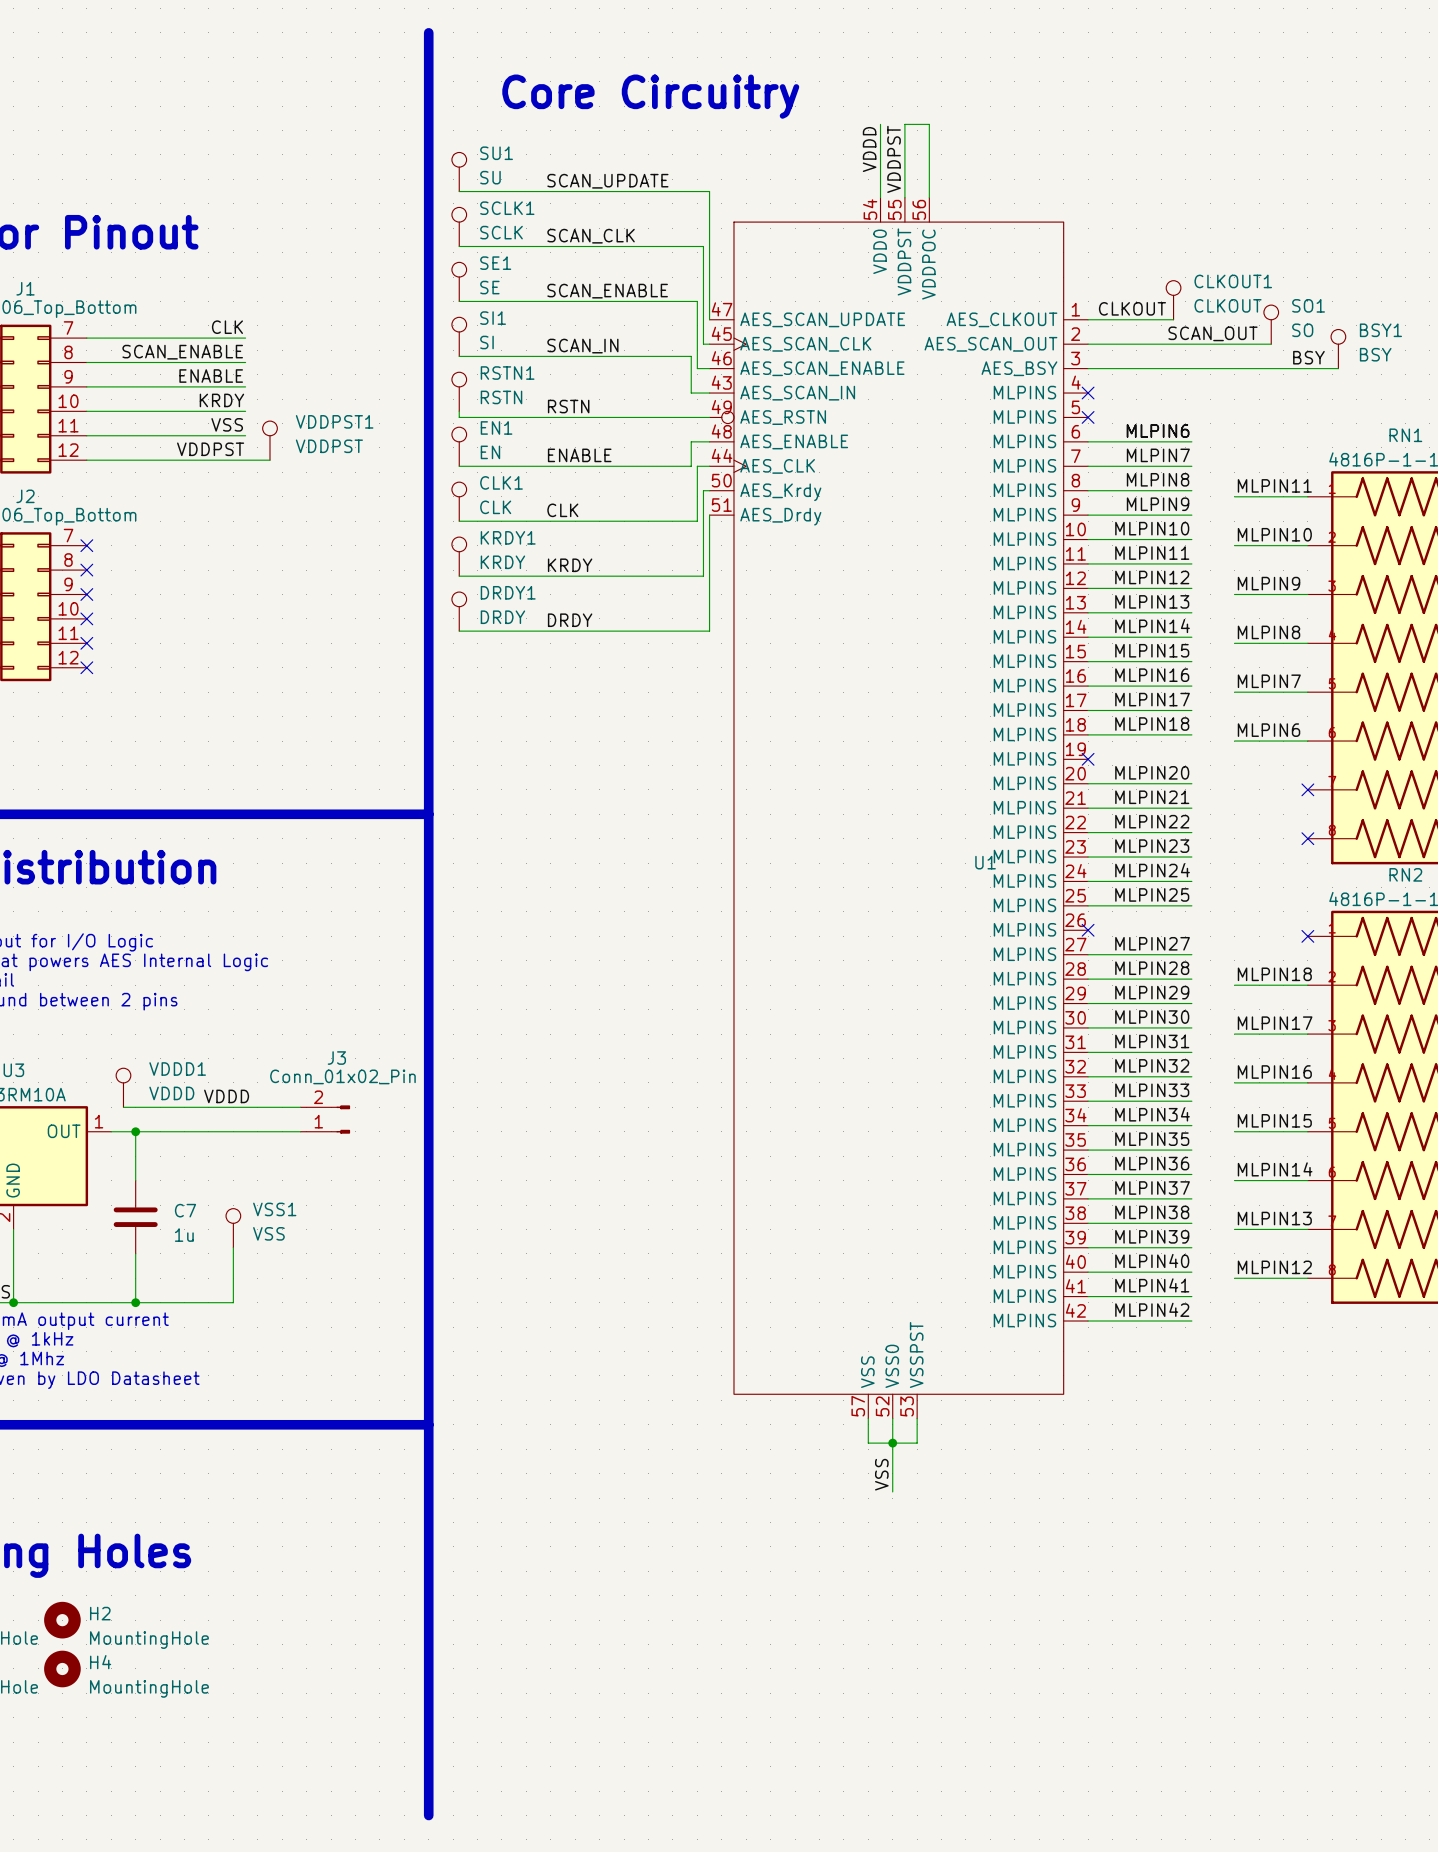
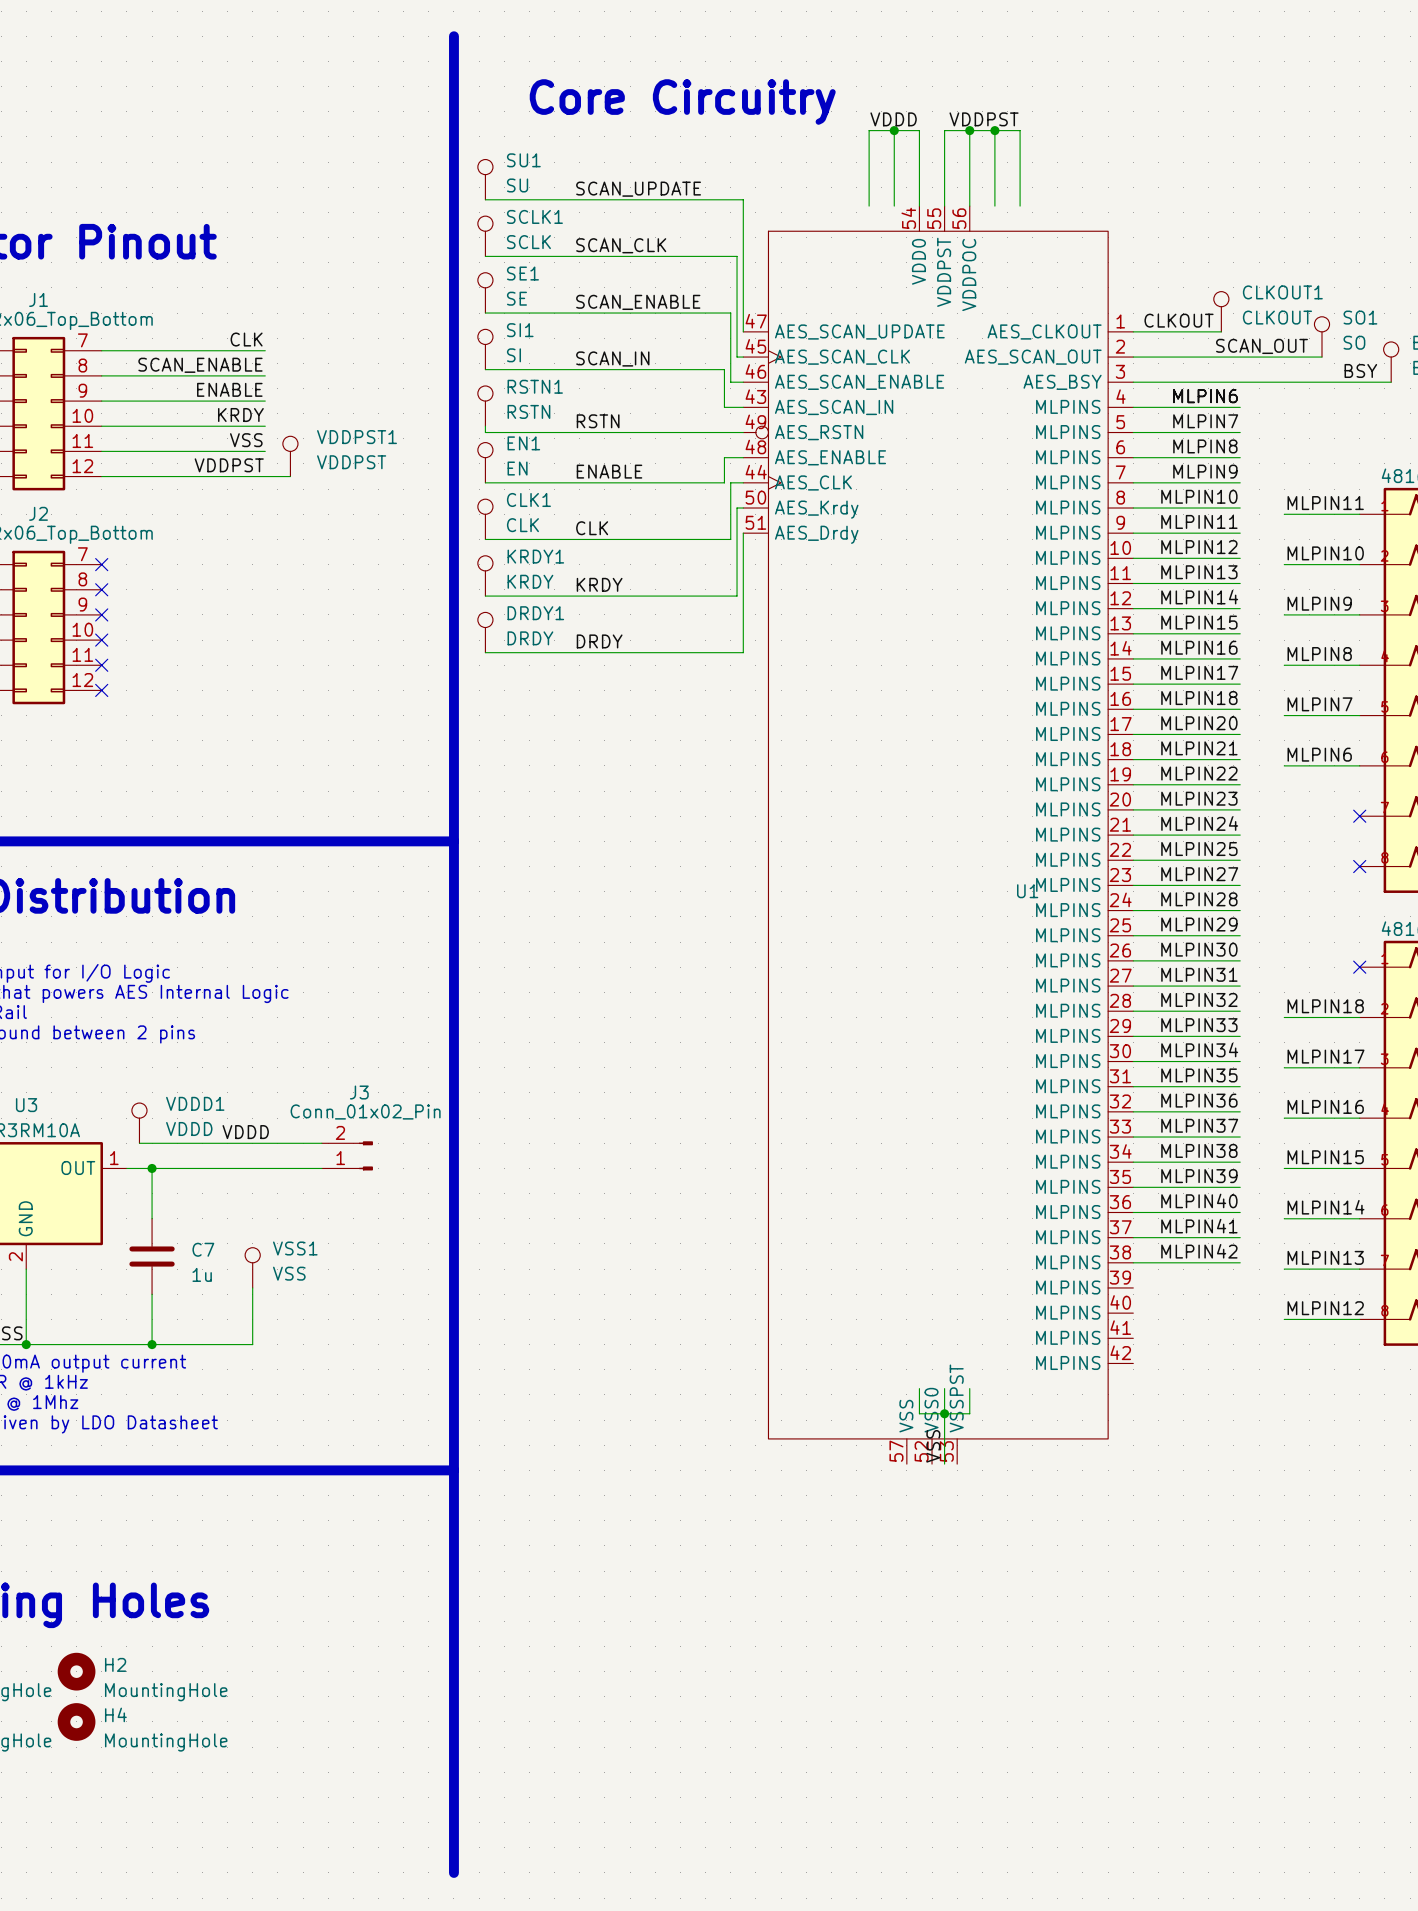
wire: none -> (894, 130) (894, 206)
junction: none -> (894, 130)
wire: none -> (919, 130) (869, 130) (869, 206)
wire: none -> (969, 130) (1020, 130) (1020, 206)
junction: none -> (969, 130)
wire: none -> (994, 130) (994, 206)
junction: none -> (994, 130)
label rotation: 0° (869, 149) -> 90° clockwise (893, 119)
label rotation: 0° (894, 159) -> 90° clockwise (984, 119)
label: none -> MLPIN6 (1205, 396)
wire: none -> (1133, 407) (1240, 407)
no-connect mark: (1088, 393) -> none
label: none -> MLPIN7 (1205, 421)
wire: none -> (1133, 432) (1240, 432)
no-connect mark: (1088, 417) -> none
label: MLPIN6 (1158, 430) -> MLPIN8 (1205, 446)
label: MLPIN7 (1158, 455) -> MLPIN9 (1205, 471)
label: MLPIN8 (1158, 479) -> MLPIN10 (1199, 496)
label: MLPIN9 (1158, 504) -> MLPIN11 (1199, 521)
label: MLPIN10 (1152, 528) -> MLPIN12 (1199, 547)
label: MLPIN11 (1152, 553) -> MLPIN13 (1199, 572)
label: MLPIN12 (1152, 577) -> MLPIN14 (1199, 597)
label: MLPIN13 (1152, 601) -> MLPIN15 (1199, 622)
label: MLPIN14 (1152, 626) -> MLPIN16 (1199, 647)
label: MLPIN15 (1152, 650) -> MLPIN17 (1199, 672)
label: MLPIN16 (1152, 675) -> MLPIN18 (1199, 698)
label: MLPIN17 (1152, 699) -> MLPIN20 (1199, 723)
label: MLPIN18 (1152, 724) -> MLPIN21 (1199, 748)
label: none -> MLPIN22 (1199, 773)
wire: none -> (1133, 784) (1240, 784)
no-connect mark: (1088, 759) -> none
label: MLPIN20 (1152, 772) -> MLPIN23 (1199, 798)
label: MLPIN21 (1152, 797) -> MLPIN24 (1199, 823)
label: MLPIN22 (1152, 821) -> MLPIN25 (1199, 849)
label: MLPIN23 (1152, 846) -> MLPIN27 (1199, 874)
label: MLPIN24 (1152, 870) -> MLPIN28 (1199, 899)
label: MLPIN25 (1152, 894) -> MLPIN29 (1199, 924)
label: none -> MLPIN30 (1199, 949)
wire: none -> (1133, 960) (1240, 960)
no-connect mark: (1088, 930) -> none
label: MLPIN27 (1152, 943) -> MLPIN31 (1199, 974)
label: MLPIN28 (1152, 968) -> MLPIN32 (1199, 999)
label: MLPIN29 (1152, 992) -> MLPIN33 (1199, 1025)
label: MLPIN30 (1152, 1017) -> MLPIN34 (1199, 1050)
label: MLPIN31 (1152, 1041) -> MLPIN35 (1199, 1075)
label: MLPIN32 (1152, 1065) -> MLPIN36 (1199, 1100)
label: MLPIN33 (1152, 1090) -> MLPIN37 (1199, 1125)
label: MLPIN34 (1152, 1114) -> MLPIN38 (1199, 1150)
label: MLPIN35 (1152, 1139) -> MLPIN39 (1199, 1176)
label: MLPIN36 (1152, 1163) -> MLPIN40 (1199, 1200)
label: MLPIN37 (1152, 1188) -> MLPIN41 (1199, 1226)
label: MLPIN38 (1152, 1212) -> MLPIN42 (1199, 1251)
label: MLPIN39 (1152, 1236) -> none
wire: (1088, 1247) (1191, 1247) -> none
label: MLPIN40 (1152, 1260) -> none
wire: (1088, 1272) (1191, 1272) -> none
label: MLPIN41 (1152, 1285) -> none
wire: (1088, 1296) (1191, 1296) -> none
label: MLPIN42 (1152, 1309) -> none
wire: (1088, 1321) (1191, 1321) -> none
junction: none -> (944, 1413)
wire: (868, 1418) (868, 1443) (917, 1443) (917, 1418) -> (919, 1388) (919, 1413) (969, 1413) (969, 1388)
wire: (892, 1418) (892, 1491) -> (944, 1388) (944, 1464)
junction: (892, 1443) -> none
label position: VSS (881, 1474) -> VSS (933, 1446)

